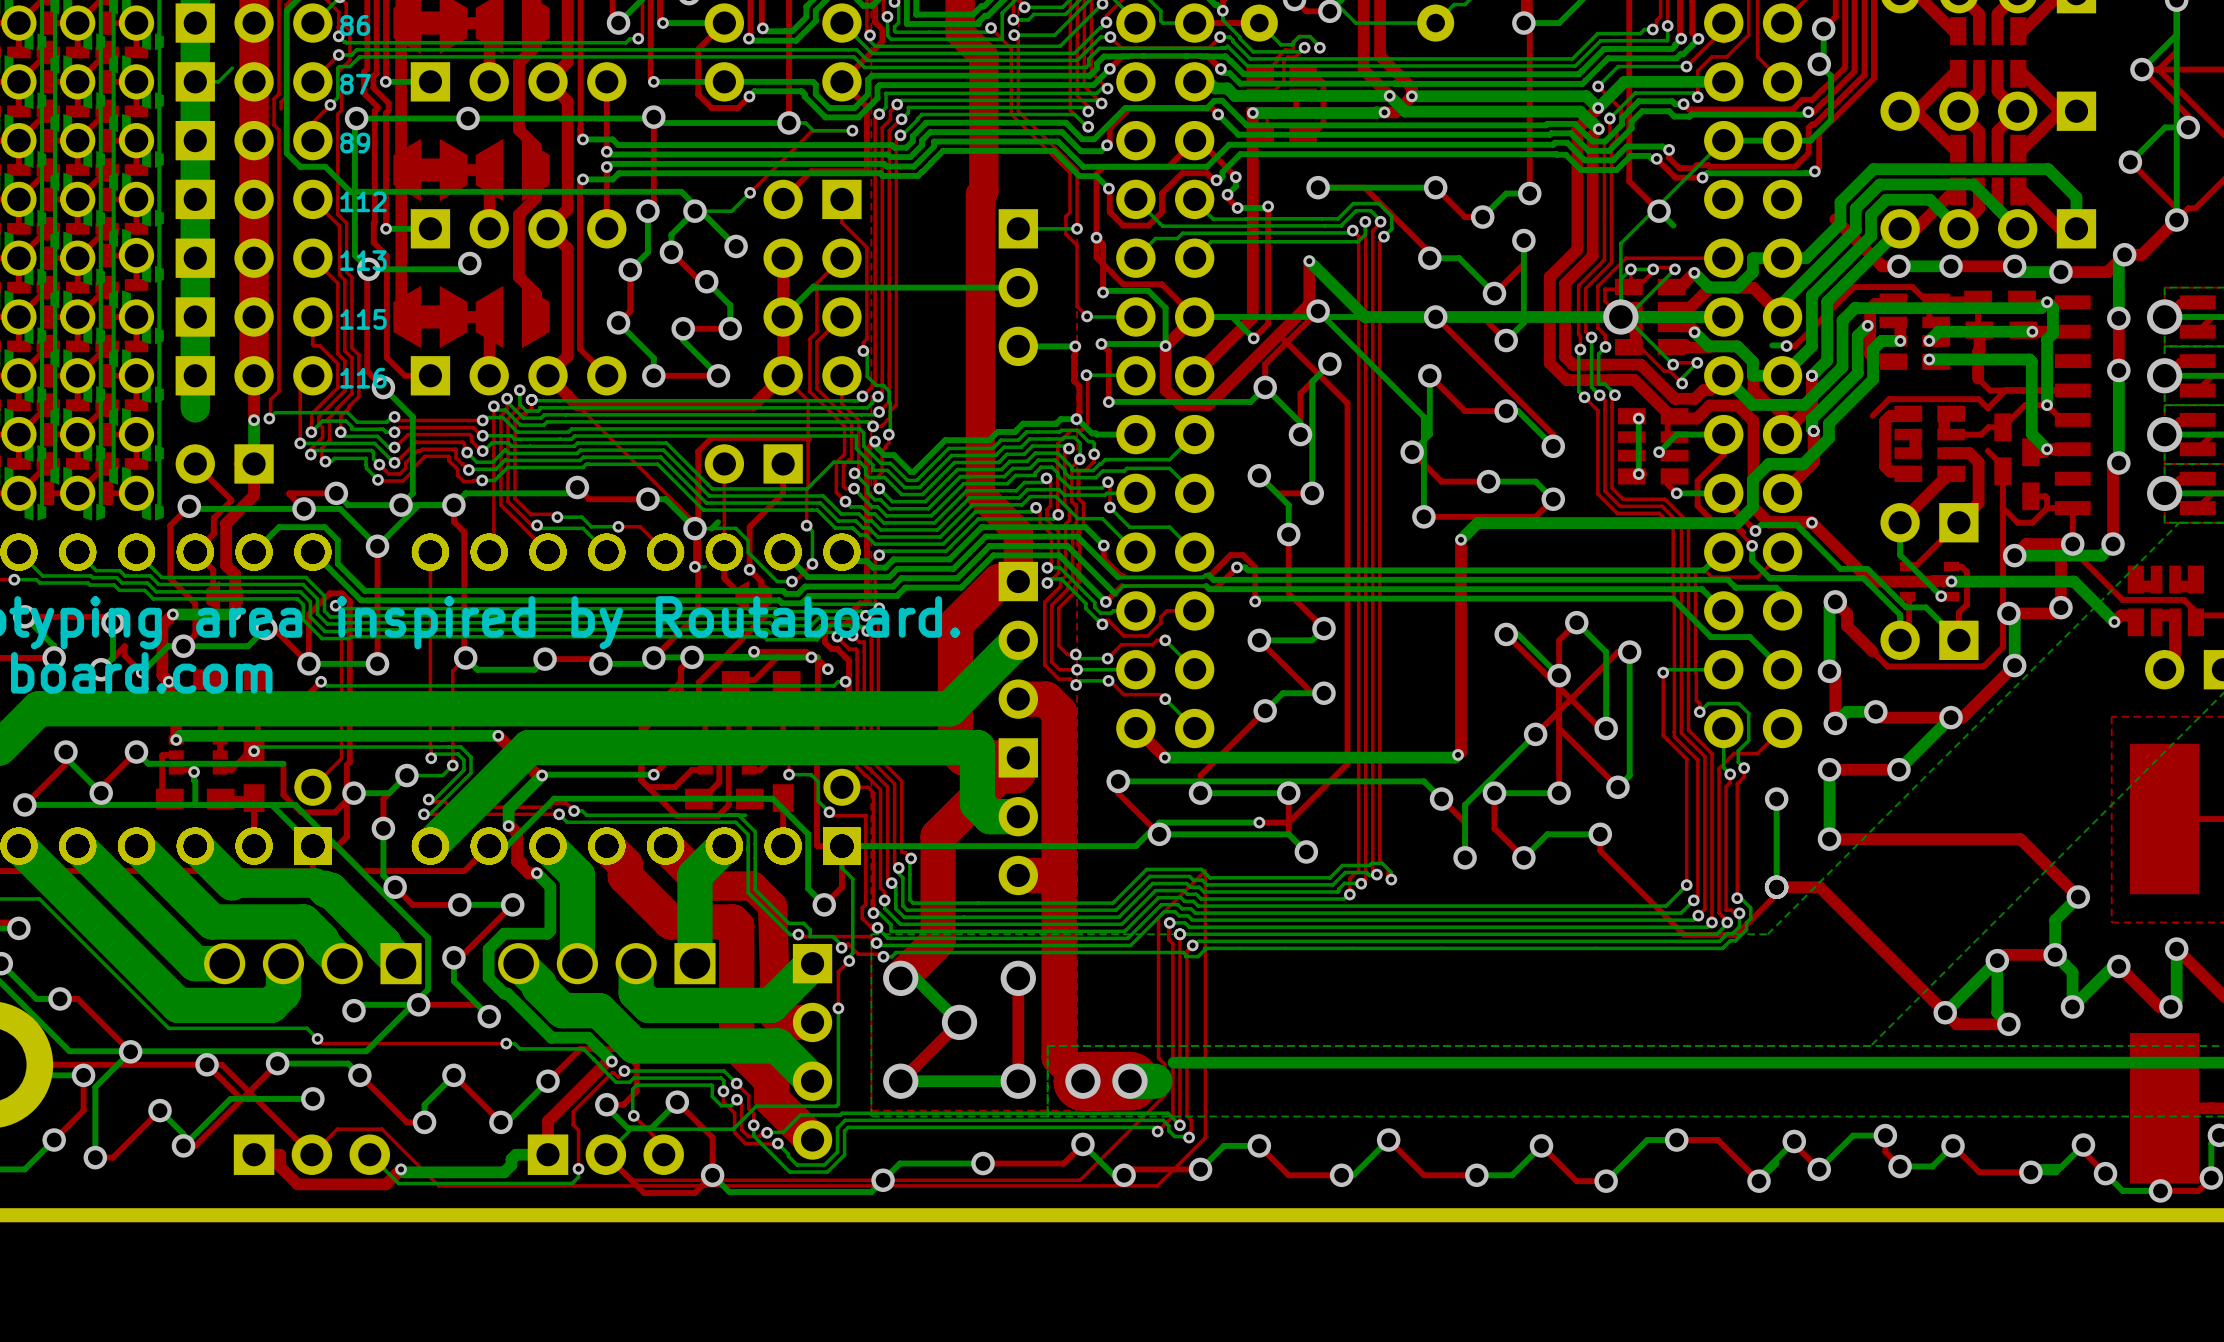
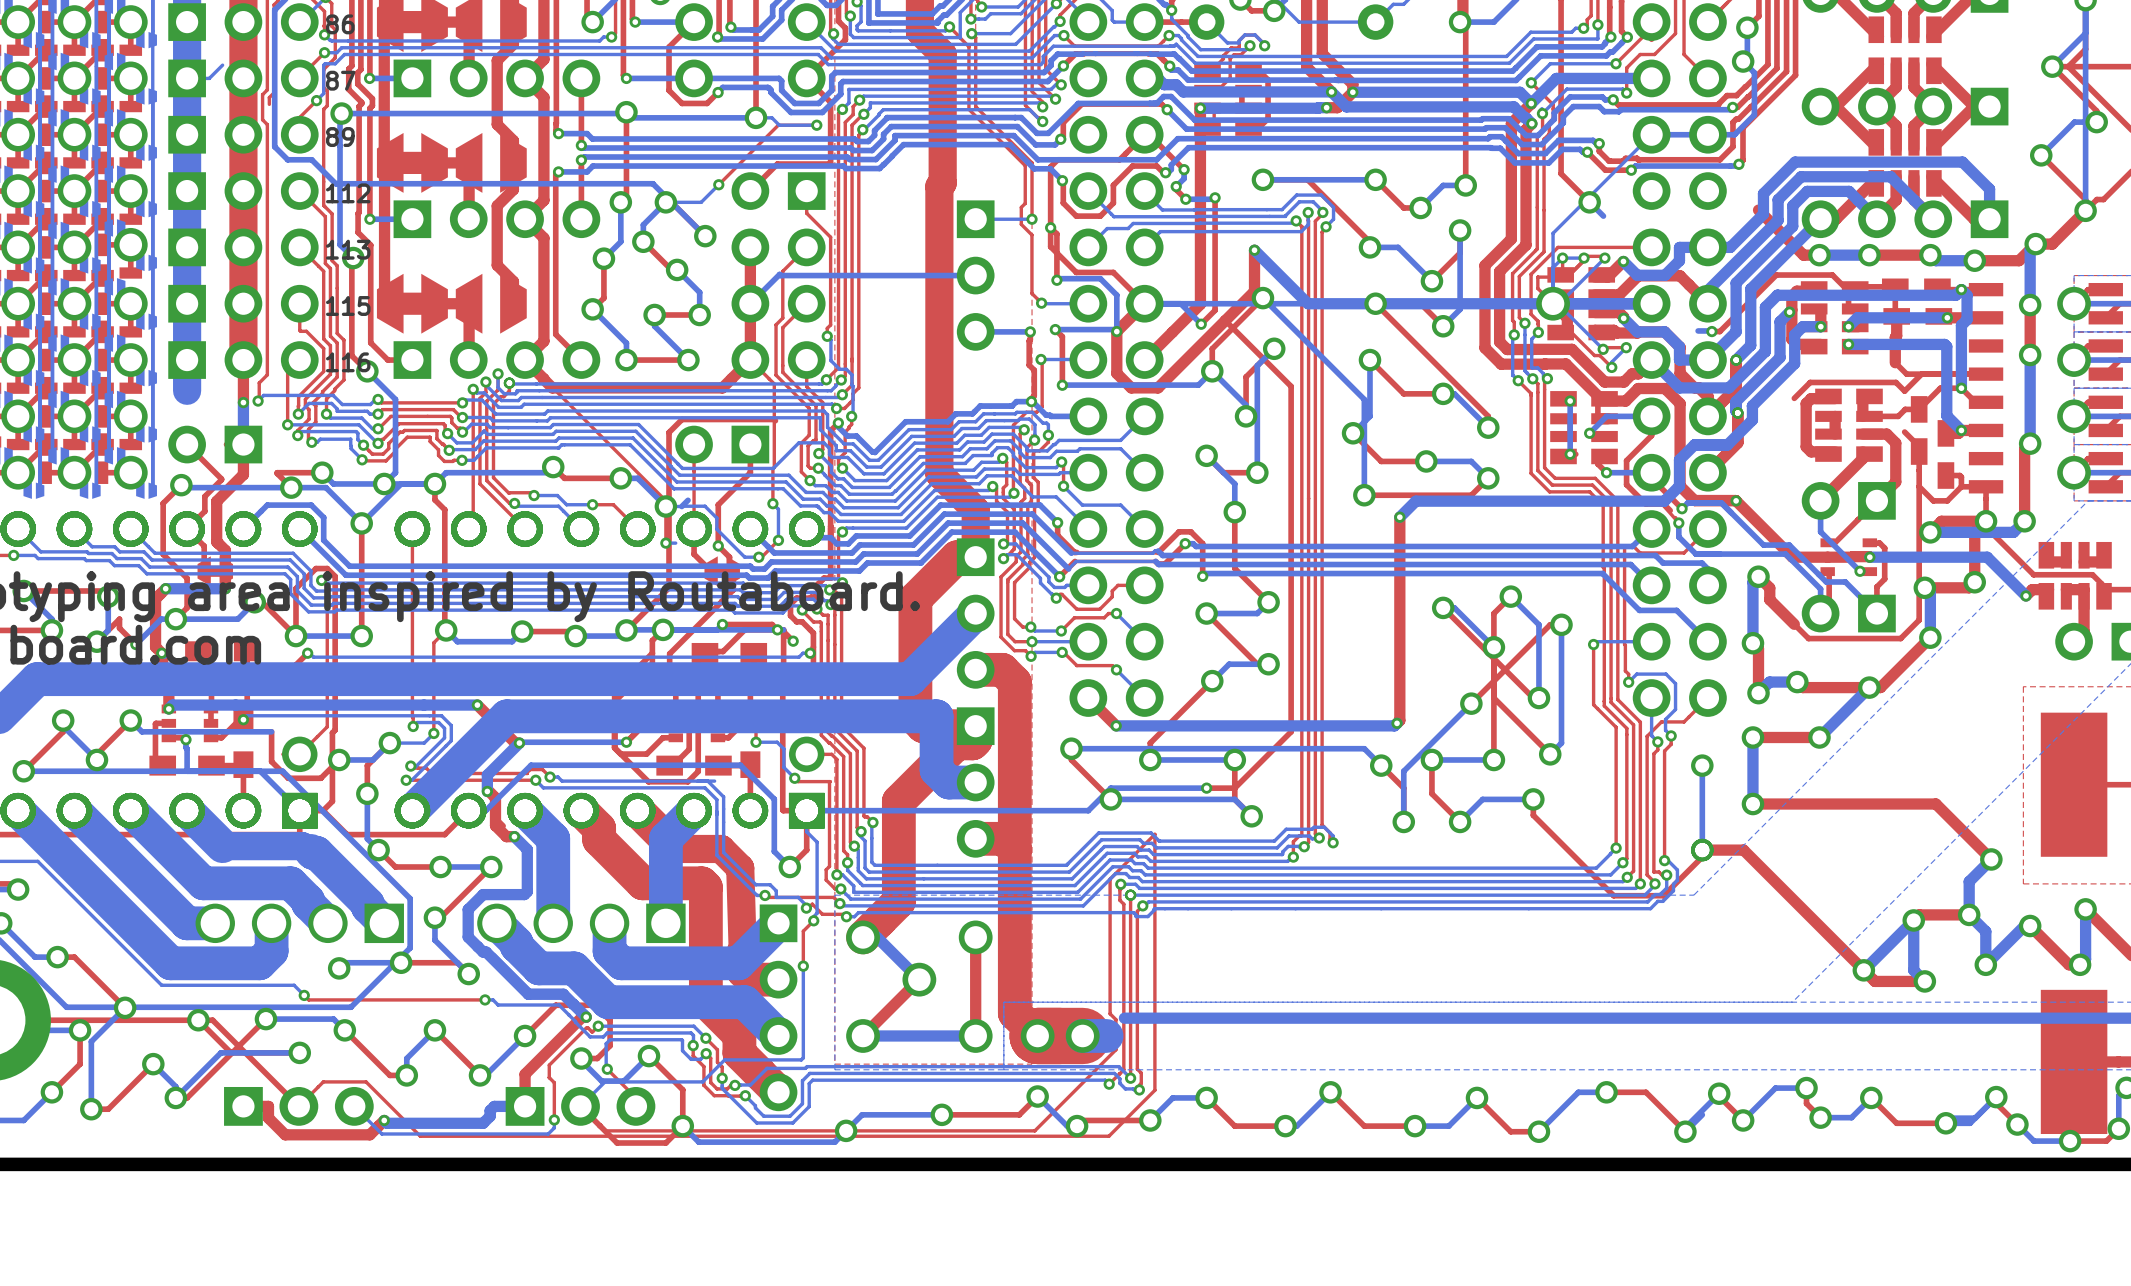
via: (468, 118) -> none
bottom track: (469, 263) (463, 269) (368, 269) -> none
via: (469, 263) -> none

